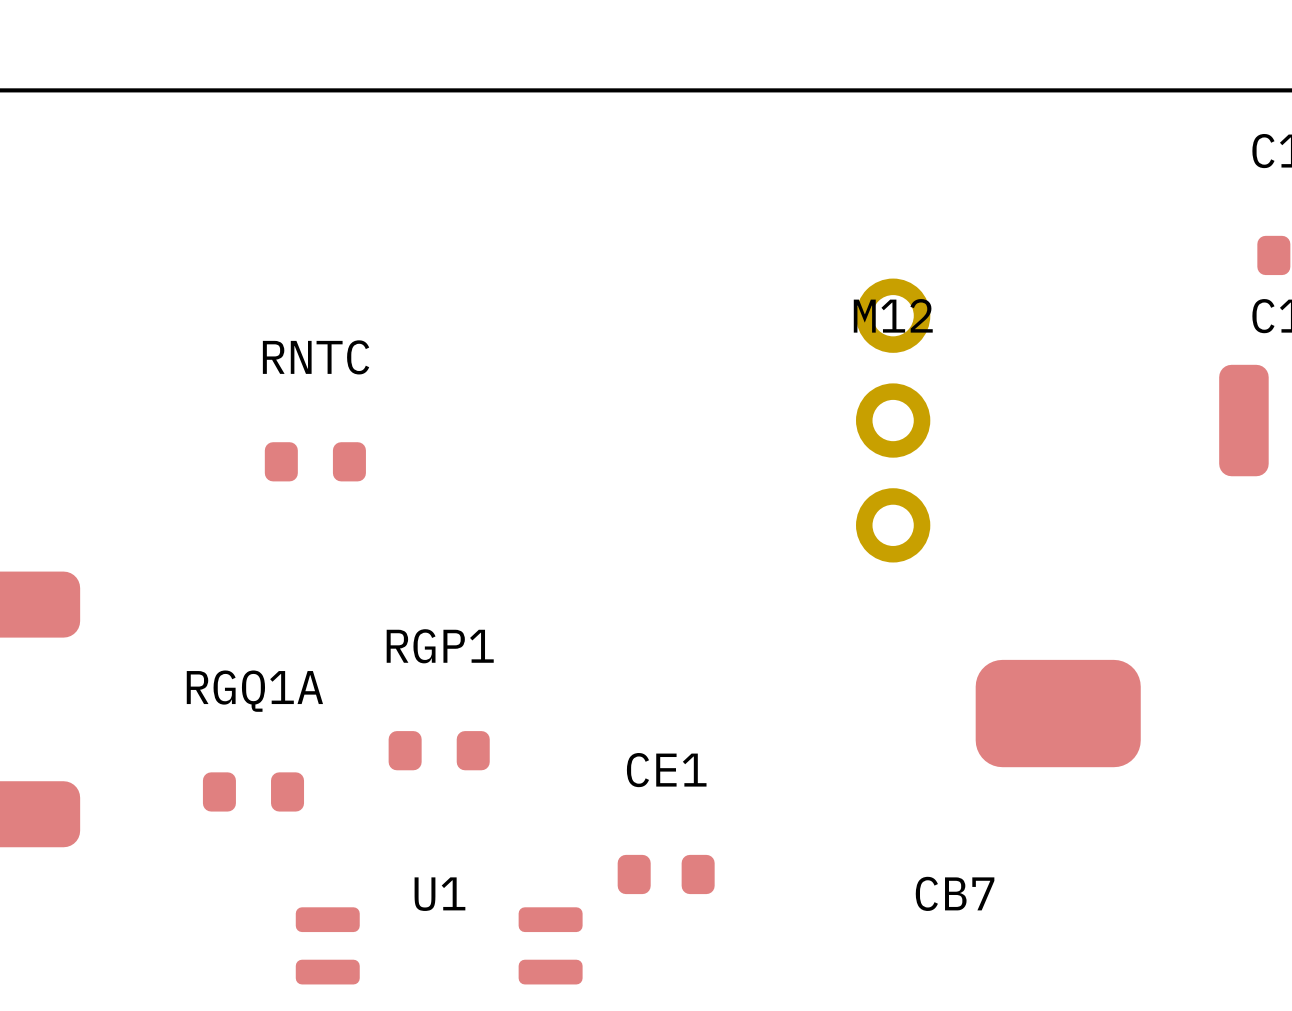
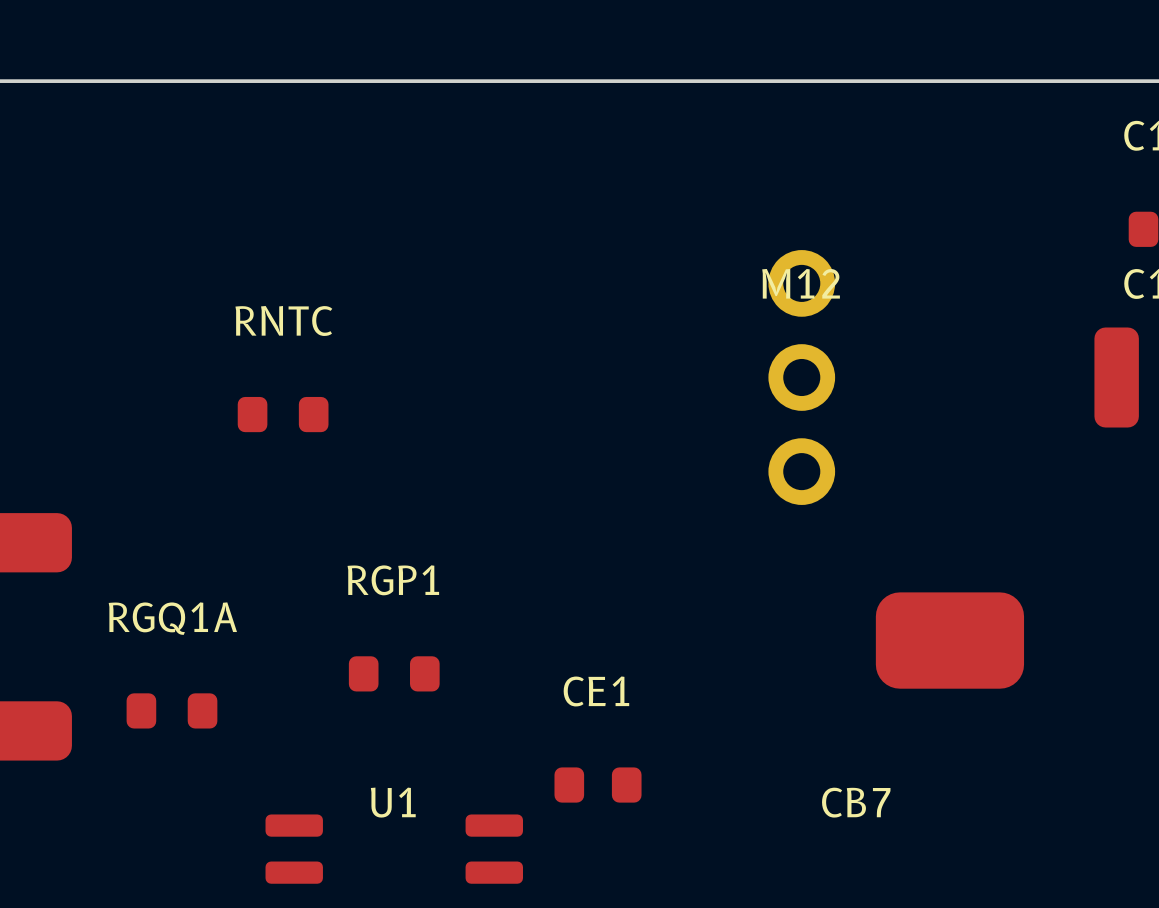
RGQ1A position: (253, 791) -> (171, 710)

